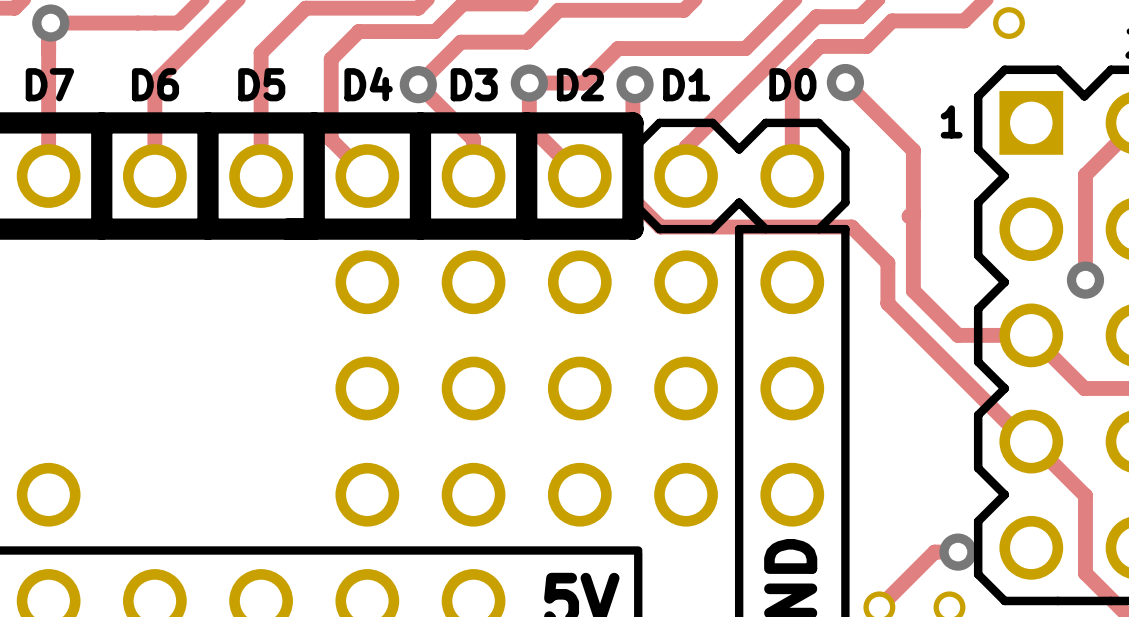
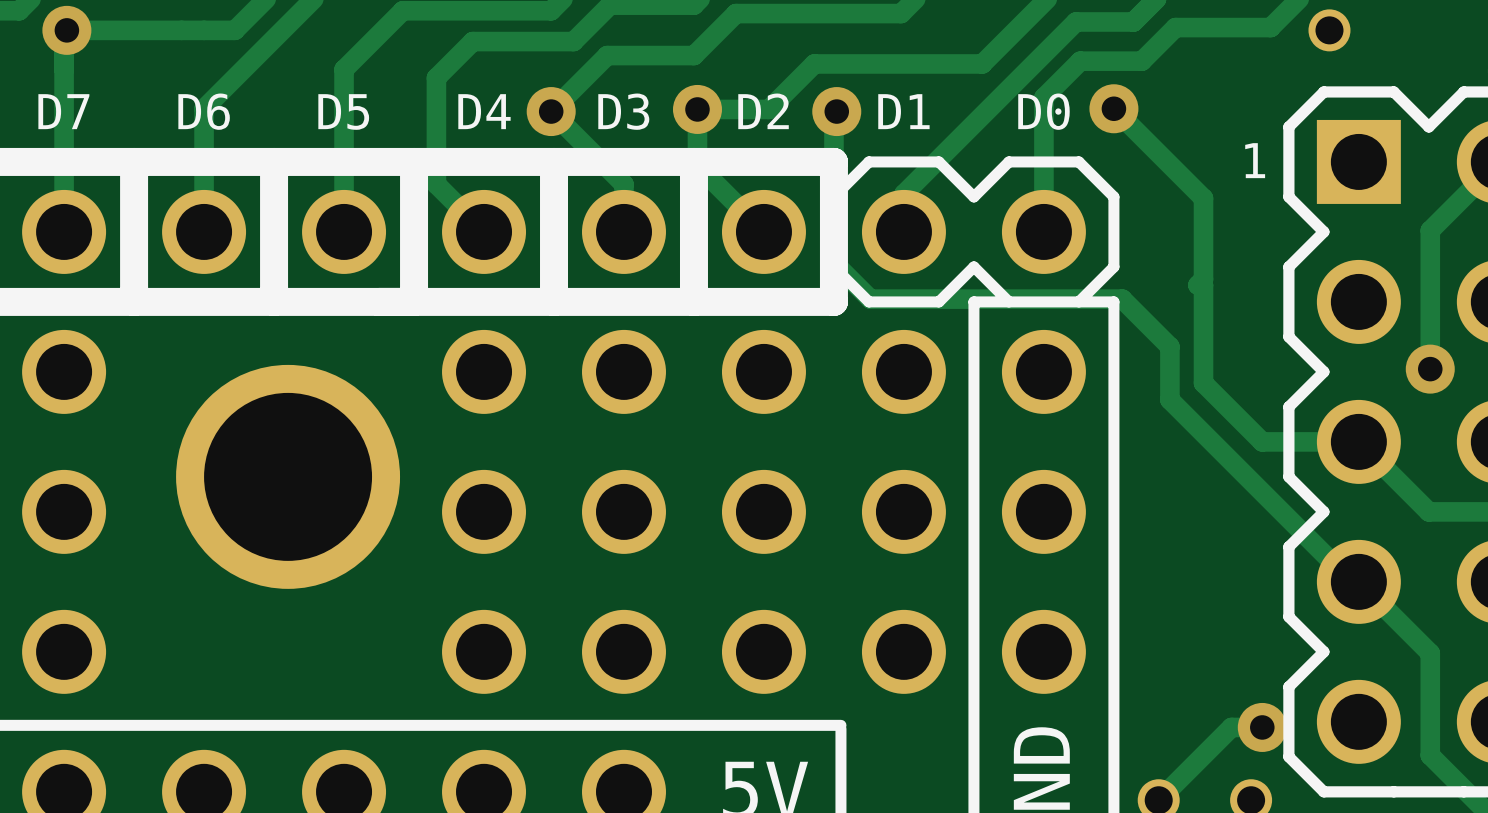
part: none -> (64, 371)
part: none -> (288, 476)
part: none -> (64, 511)

